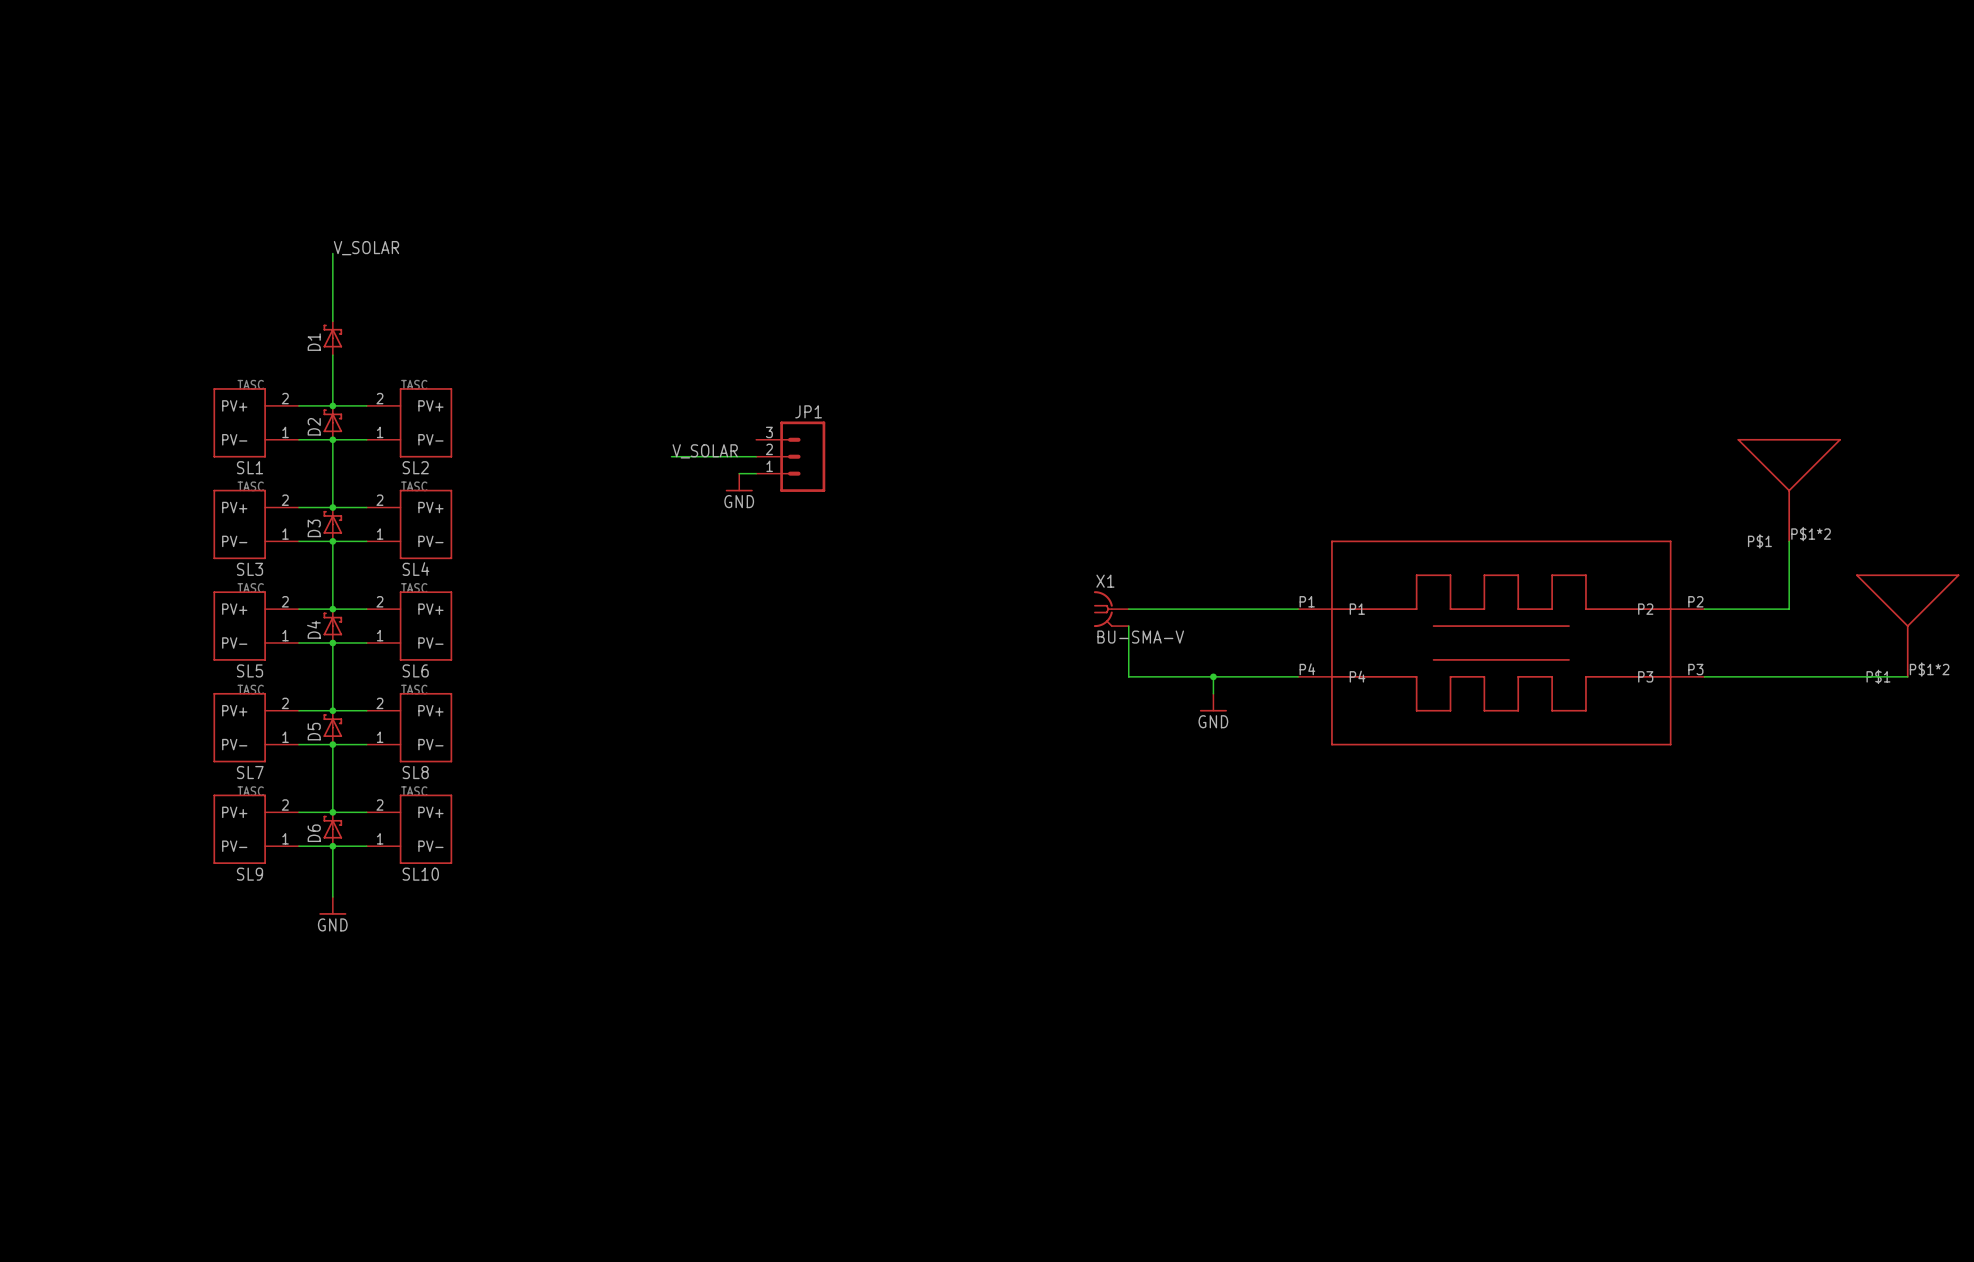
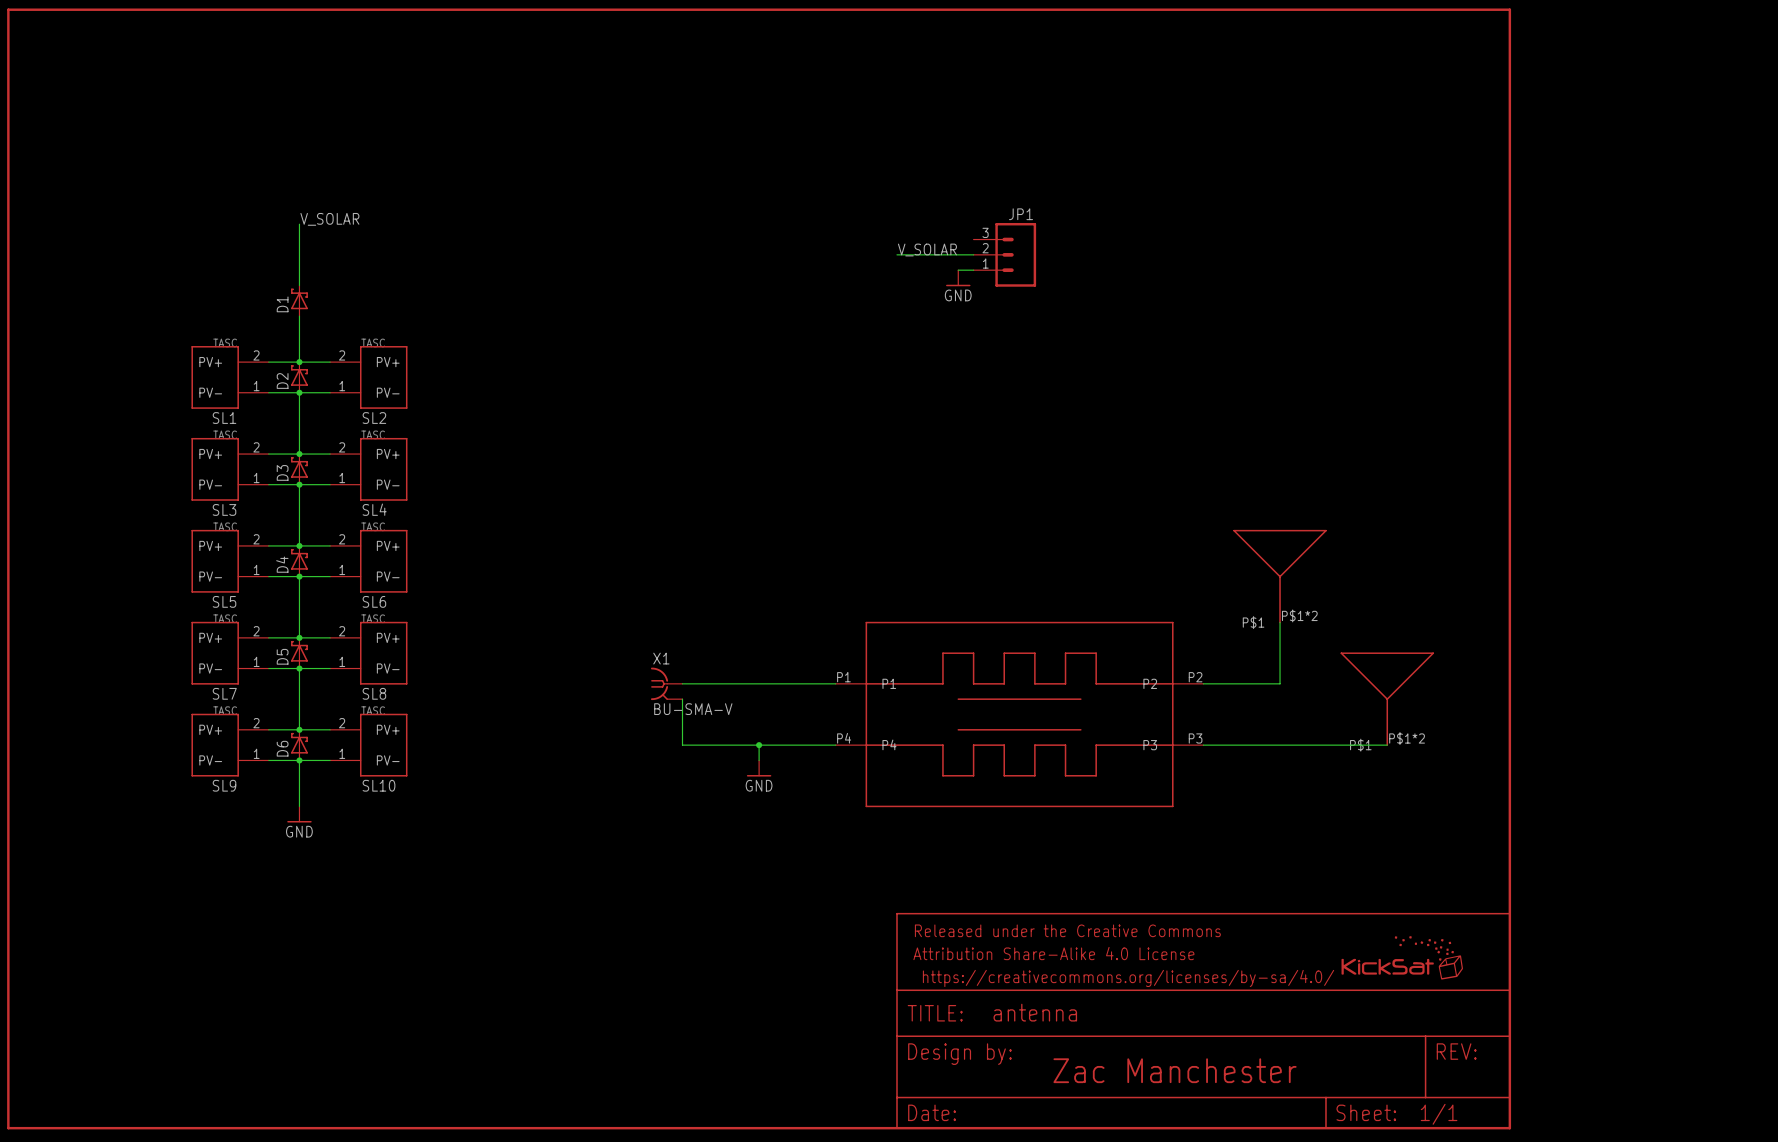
label: none -> V_SOLAR (927, 250)
wire: none -> (896, 254) (973, 254)
wire: none -> (958, 270) (973, 270)
power symbol: none -> GND (958, 278)
label: V_SOLAR (705, 451) -> none
wire: (671, 456) (756, 456) -> none
JP1 position: (790, 456) -> (1004, 254)
wire: (739, 473) (756, 473) -> none
power symbol: GND (739, 482) -> none
part: (1789, 490) -> none
wire: (1789, 541) (1789, 609) (1704, 609) -> none
X1 position: (1111, 609) -> (666, 683)
wire: (1128, 609) (1298, 609) -> none
wire: (1128, 626) (1128, 676) (1298, 676) -> none
part: (1907, 626) -> none
part: none -> (759, 568)
part: none -> (1280, 576)
part: (1501, 642) -> none
wire: (1213, 676) (1213, 693) -> none
junction: (1213, 676) -> none
wire: (1704, 676) (1907, 676) -> none
wire: none -> (1280, 622) (1280, 683) (1203, 683)
power symbol: GND (1213, 702) -> none
wire: none -> (682, 683) (835, 683)
wire: none -> (682, 699) (682, 745) (835, 745)
part: none -> (1387, 699)
part: none -> (1019, 714)
wire: none -> (759, 745) (759, 760)
junction: none -> (759, 745)
wire: none -> (1203, 745) (1387, 745)
power symbol: none -> GND (759, 768)
part: none -> (1402, 957)
part: none -> (1203, 1020)
text: none -> Zac Manchester (1175, 1070)

